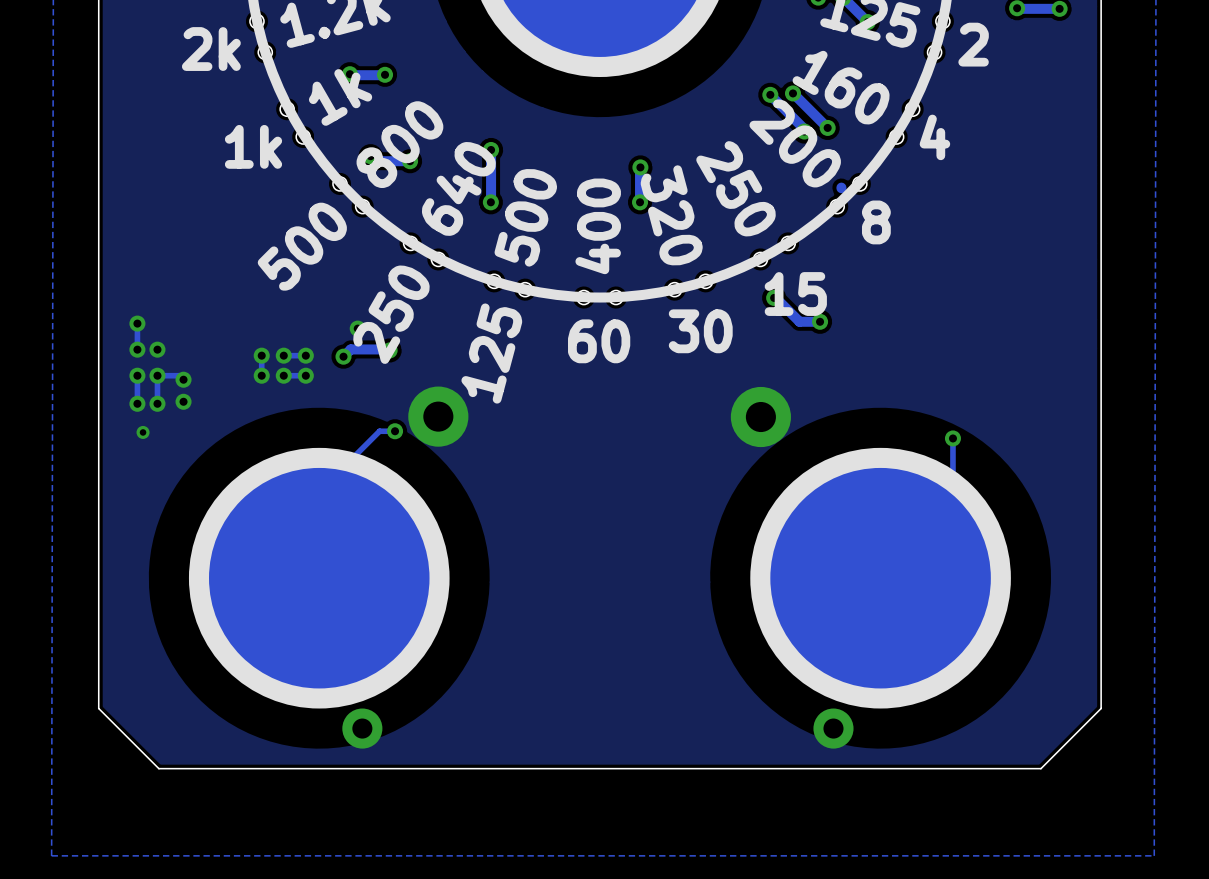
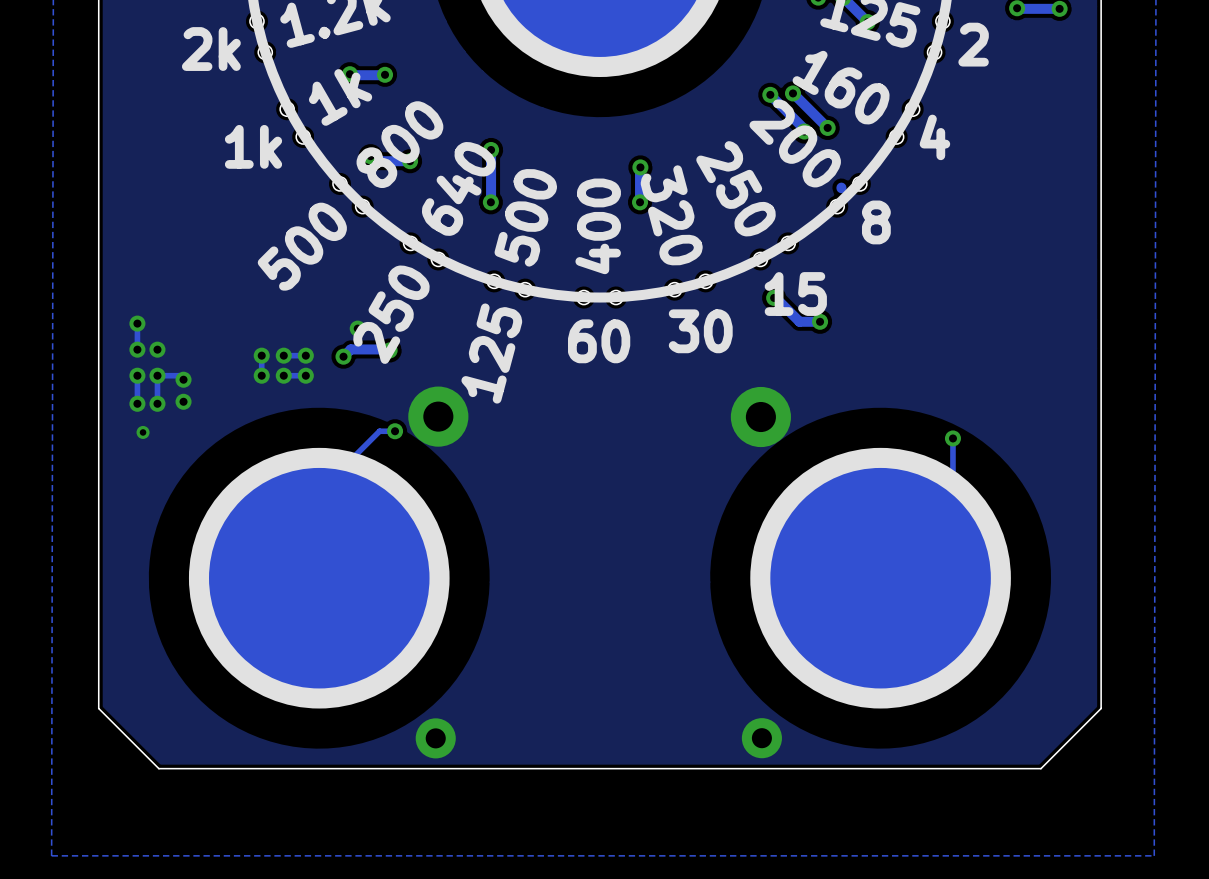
via position: (362, 728) -> (435, 738)
via position: (833, 728) -> (761, 738)

